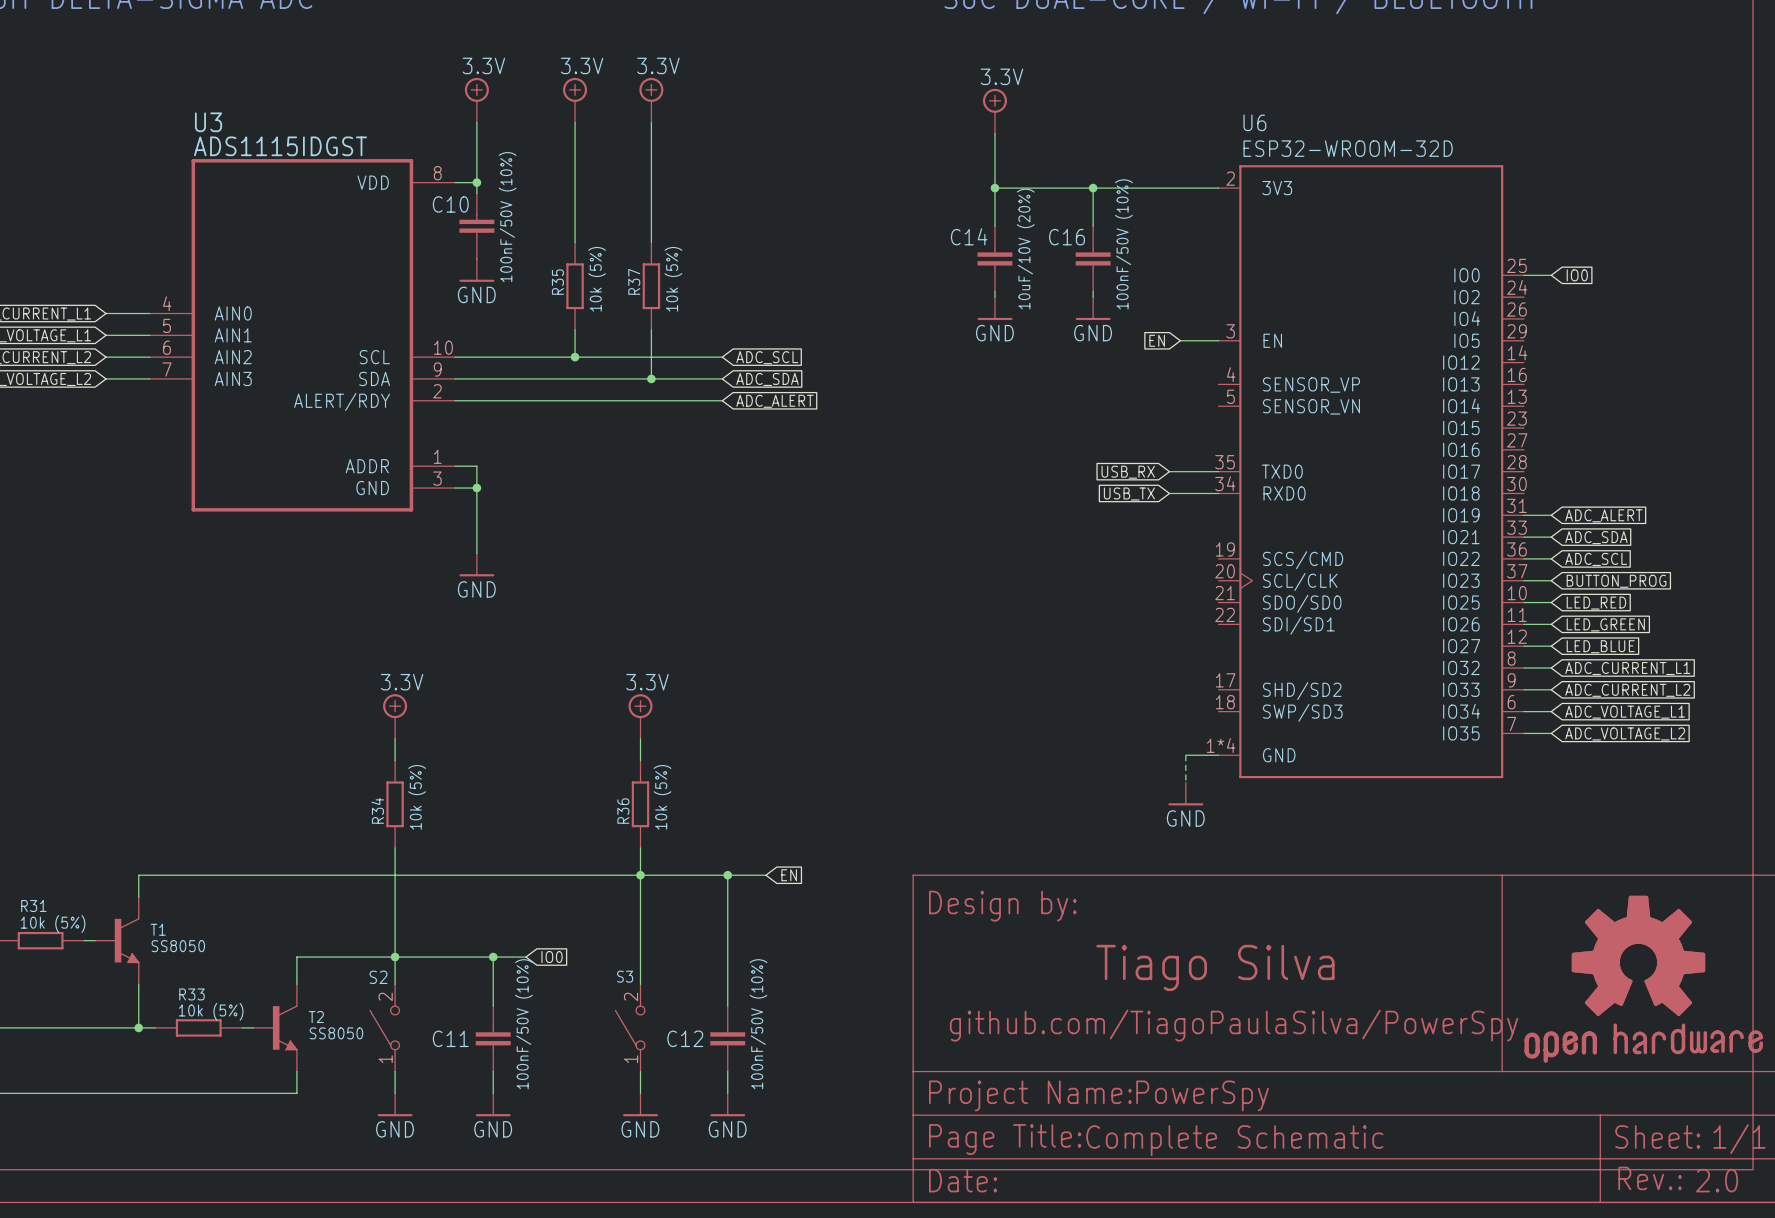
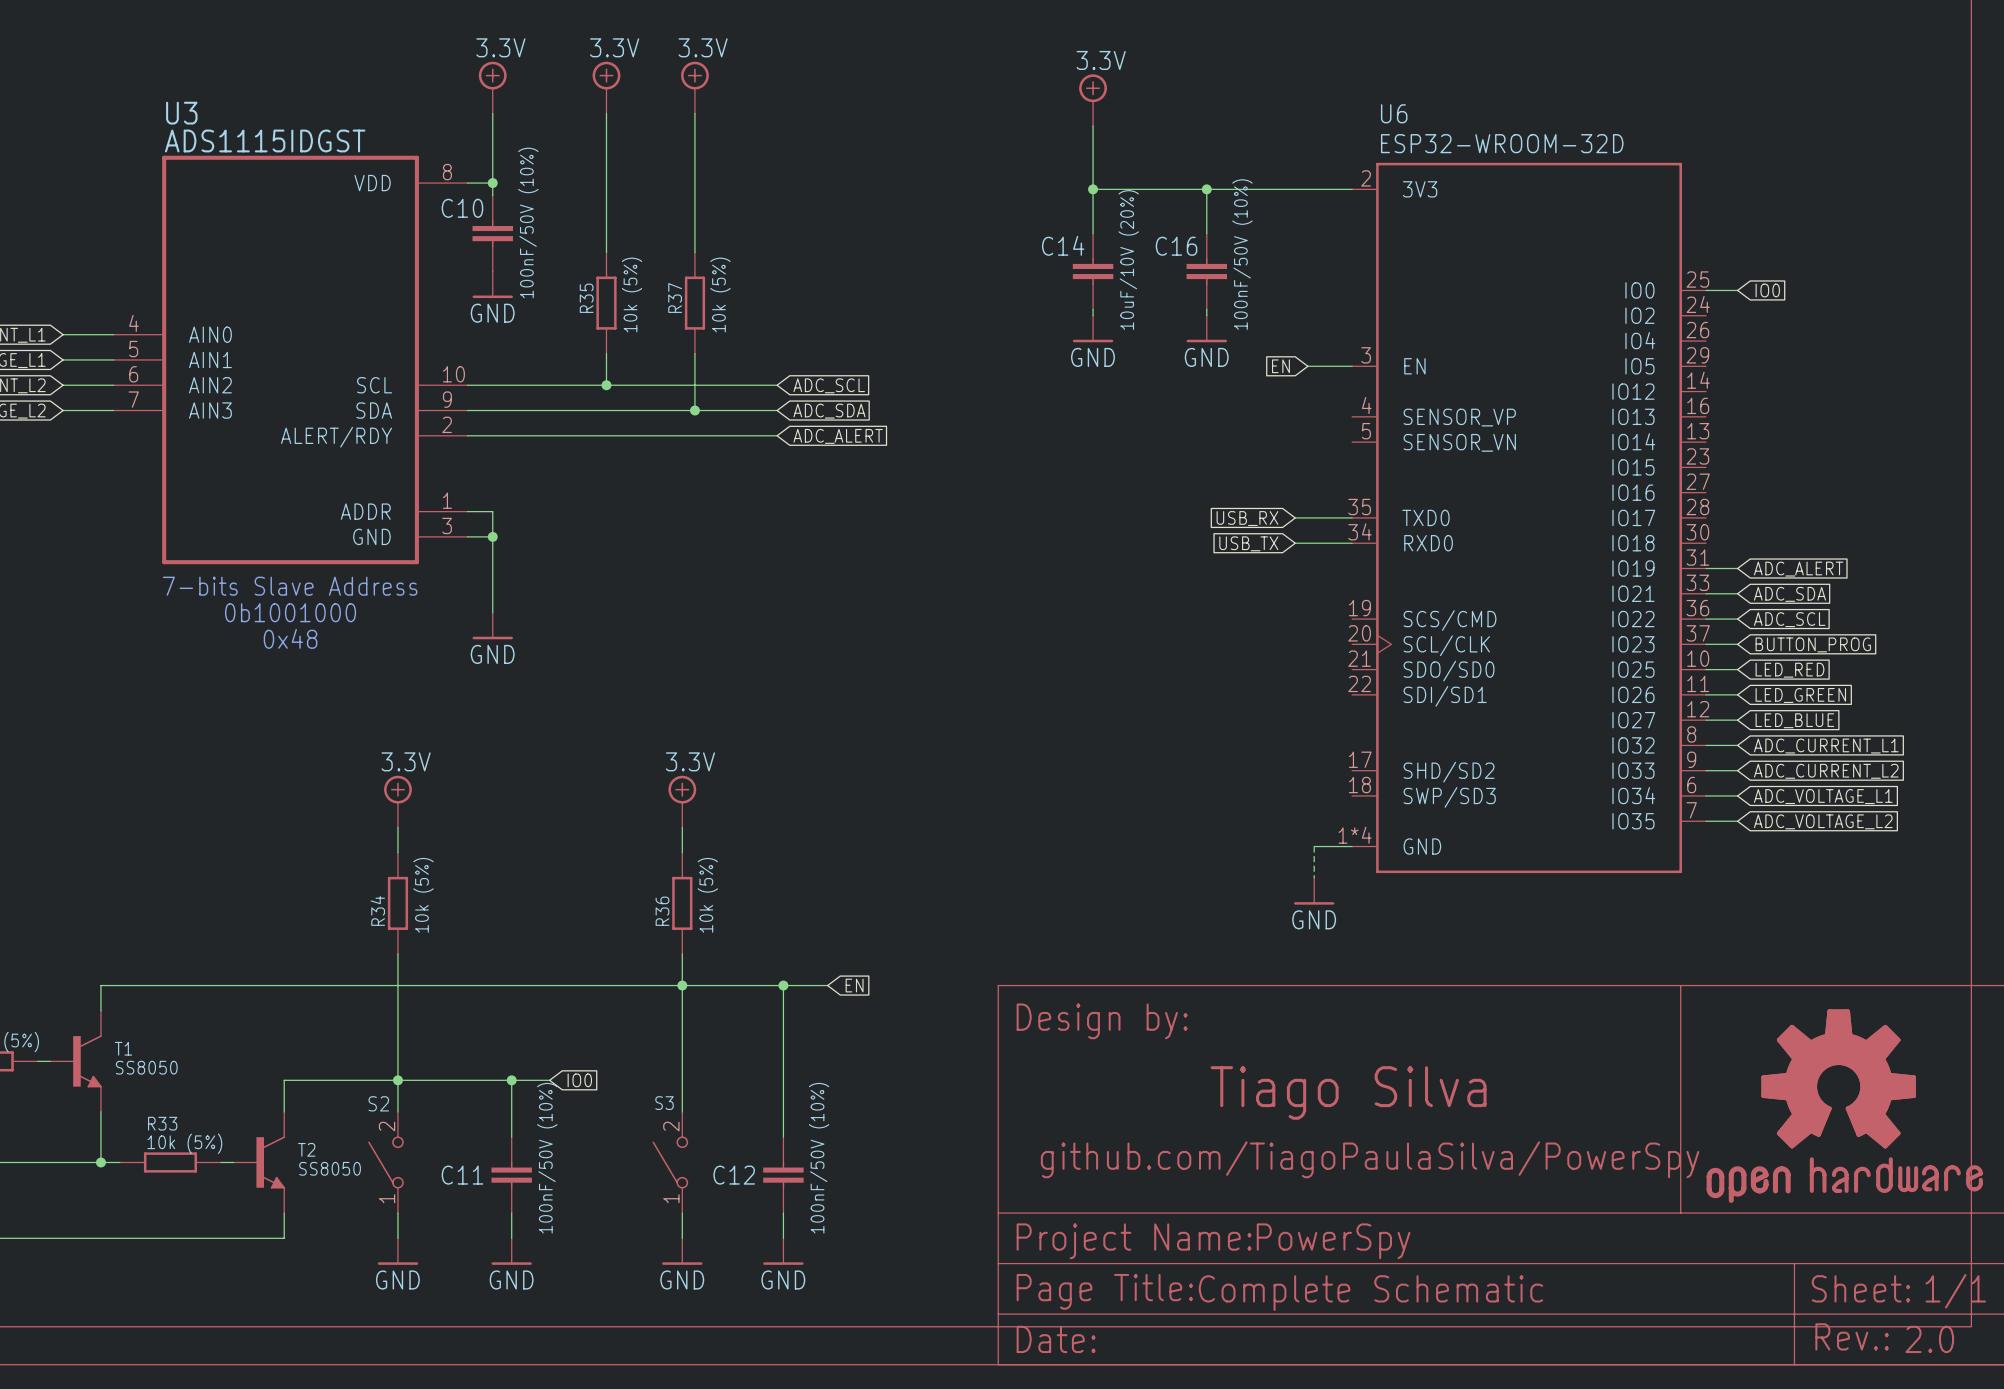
text: none -> 7-bits Slave Address (290, 586)
text: none -> 0b1001000 (290, 612)
text: none -> 0x48 (290, 638)

